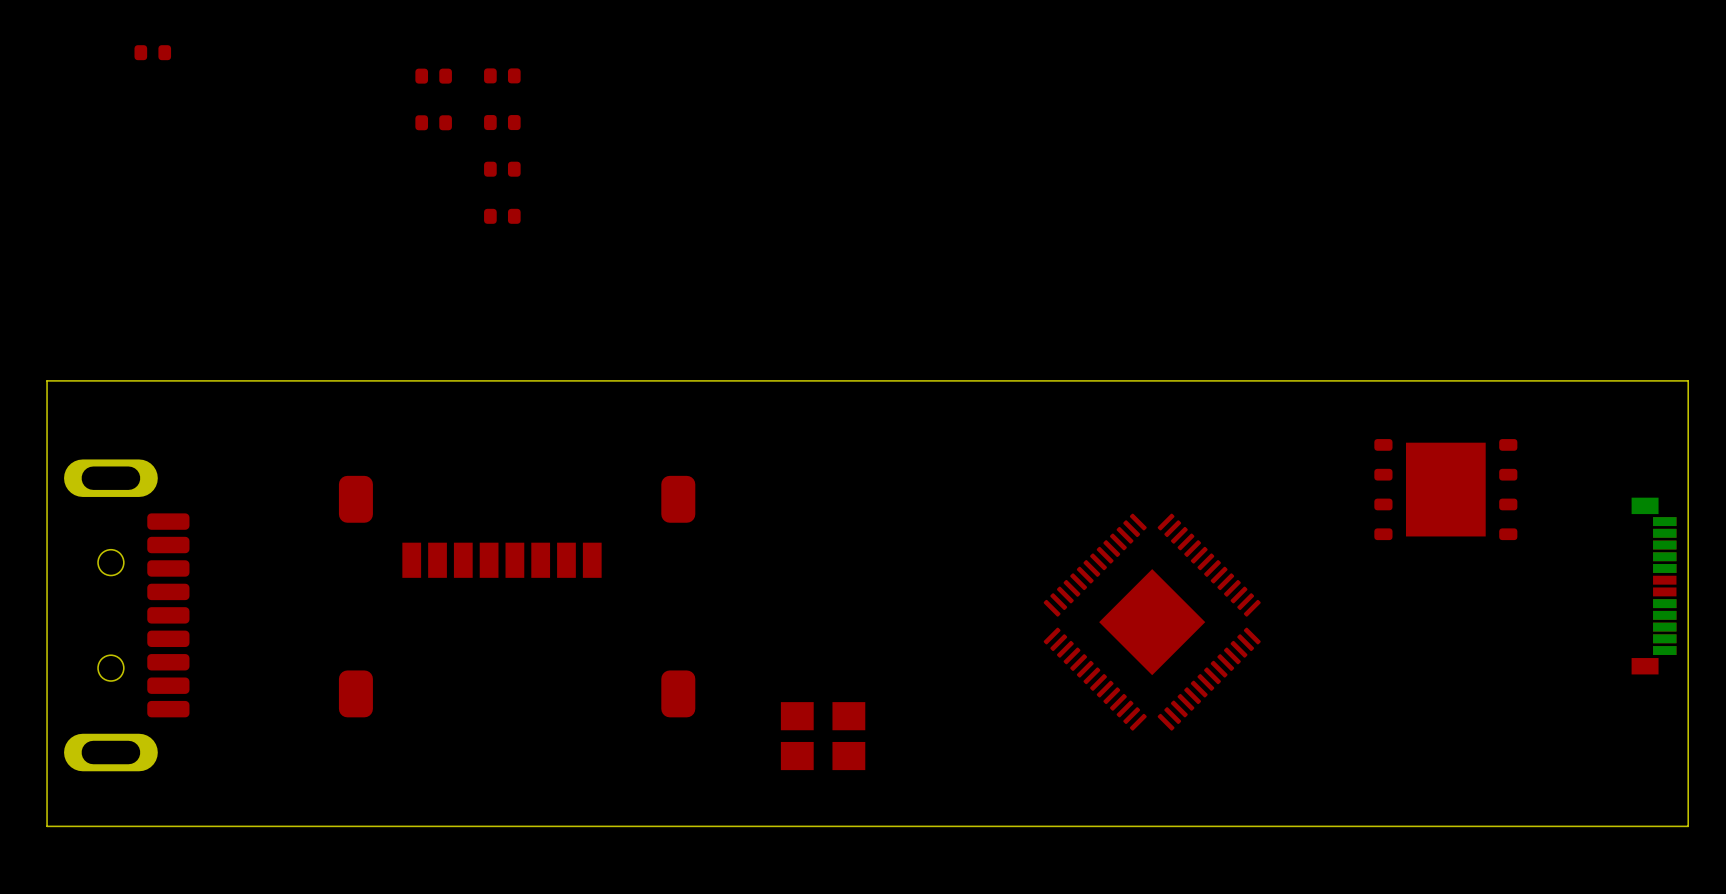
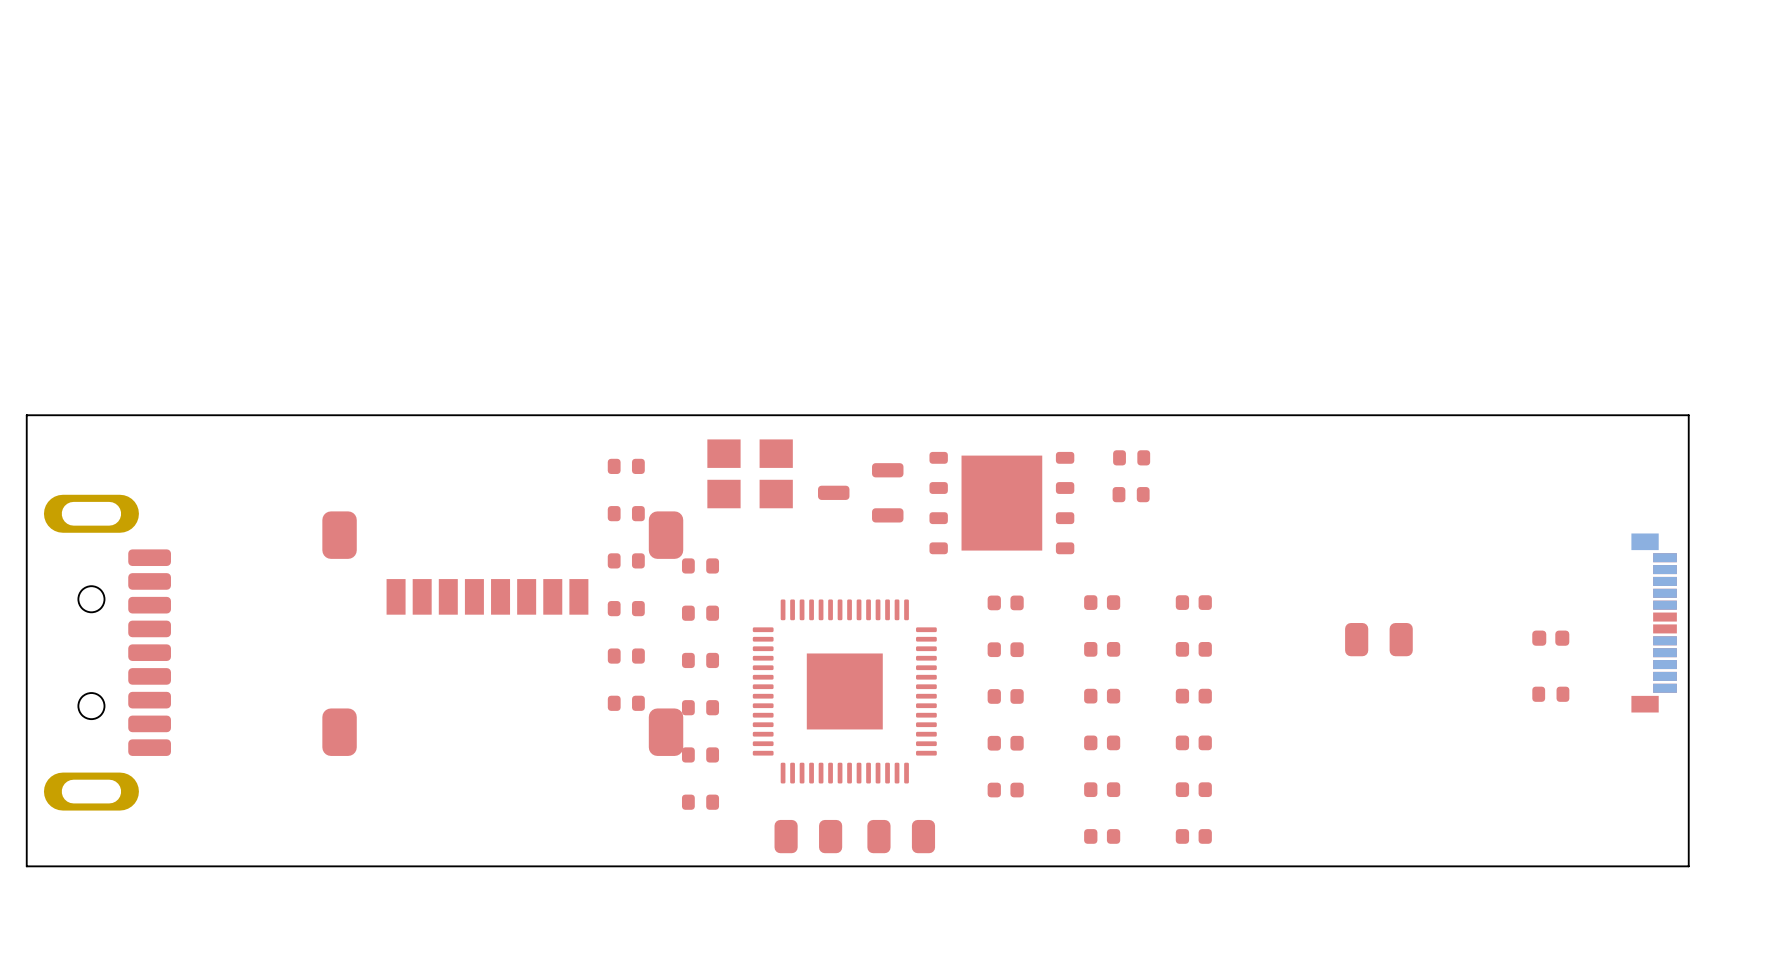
part: (152, 52) -> none
part: (502, 75) -> none
part: (433, 76) -> none
part: (433, 122) -> none
part: (502, 122) -> none
part: (502, 169) -> none
part: (502, 216) -> none
part: none -> (1131, 457)
part: none -> (626, 466)
part: none -> (860, 492)
part: none -> (1131, 494)
part: none -> (626, 513)
part position: (1445, 489) -> (1001, 503)
part: none -> (626, 560)
part: none -> (700, 565)
part: none -> (1102, 602)
part: none -> (1193, 602)
part: none -> (1005, 602)
part: none -> (626, 608)
part: none -> (700, 613)
part: none -> (1550, 638)
part: none -> (1378, 639)
part: none -> (1005, 649)
part: none -> (1102, 649)
part: none -> (1193, 649)
part: none -> (626, 656)
part: (1152, 622) -> none
part: none -> (700, 660)
part: none -> (844, 691)
part: none -> (1550, 694)
part: none -> (1005, 696)
part: none -> (1102, 696)
part: none -> (1193, 696)
part: none -> (626, 703)
part: none -> (700, 707)
part: none -> (1005, 743)
part: none -> (1102, 742)
part: none -> (1193, 742)
part: none -> (700, 754)
part position: (823, 736) -> (750, 473)
part: none -> (1005, 790)
part: none -> (1102, 789)
part: none -> (1193, 789)
part: none -> (700, 802)
part: none -> (808, 836)
part: none -> (901, 836)
part: none -> (1102, 836)
part: none -> (1193, 836)

